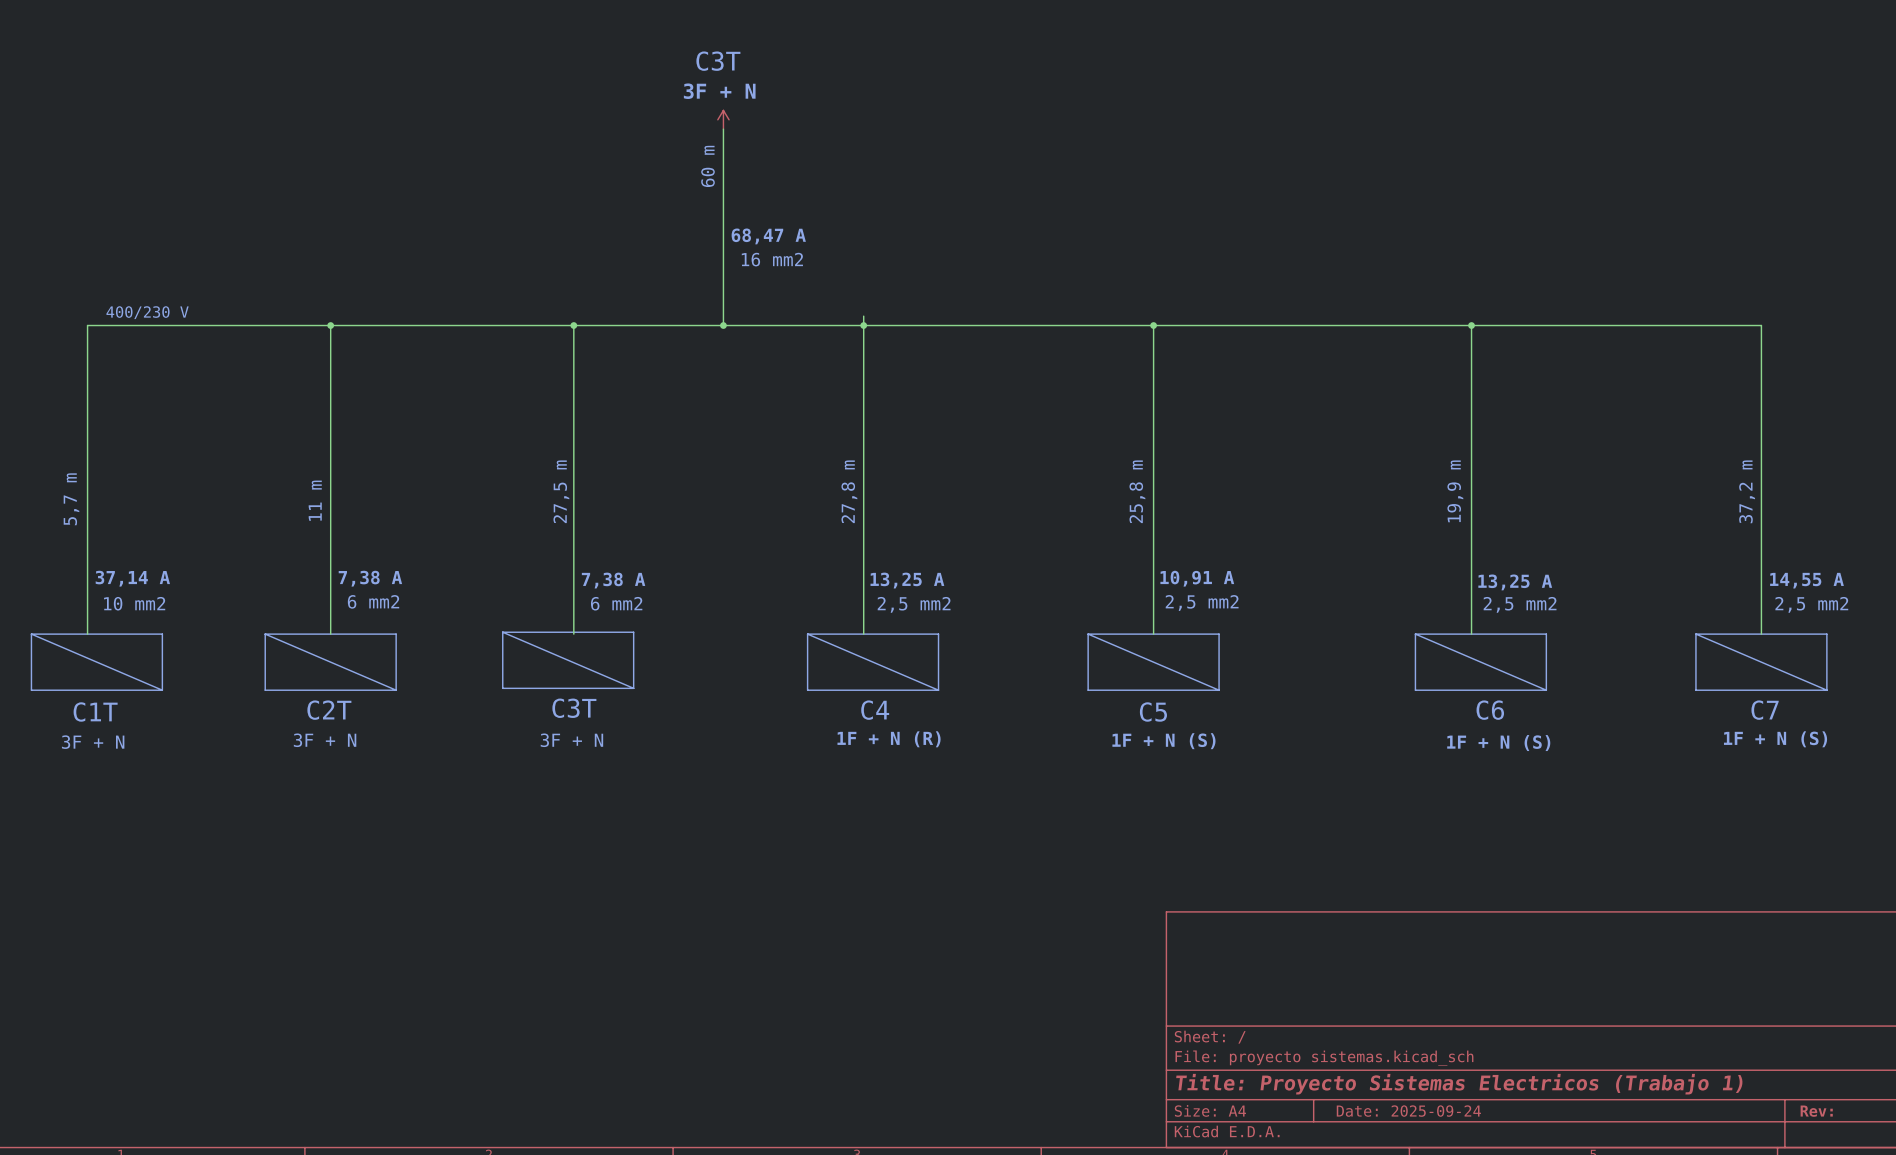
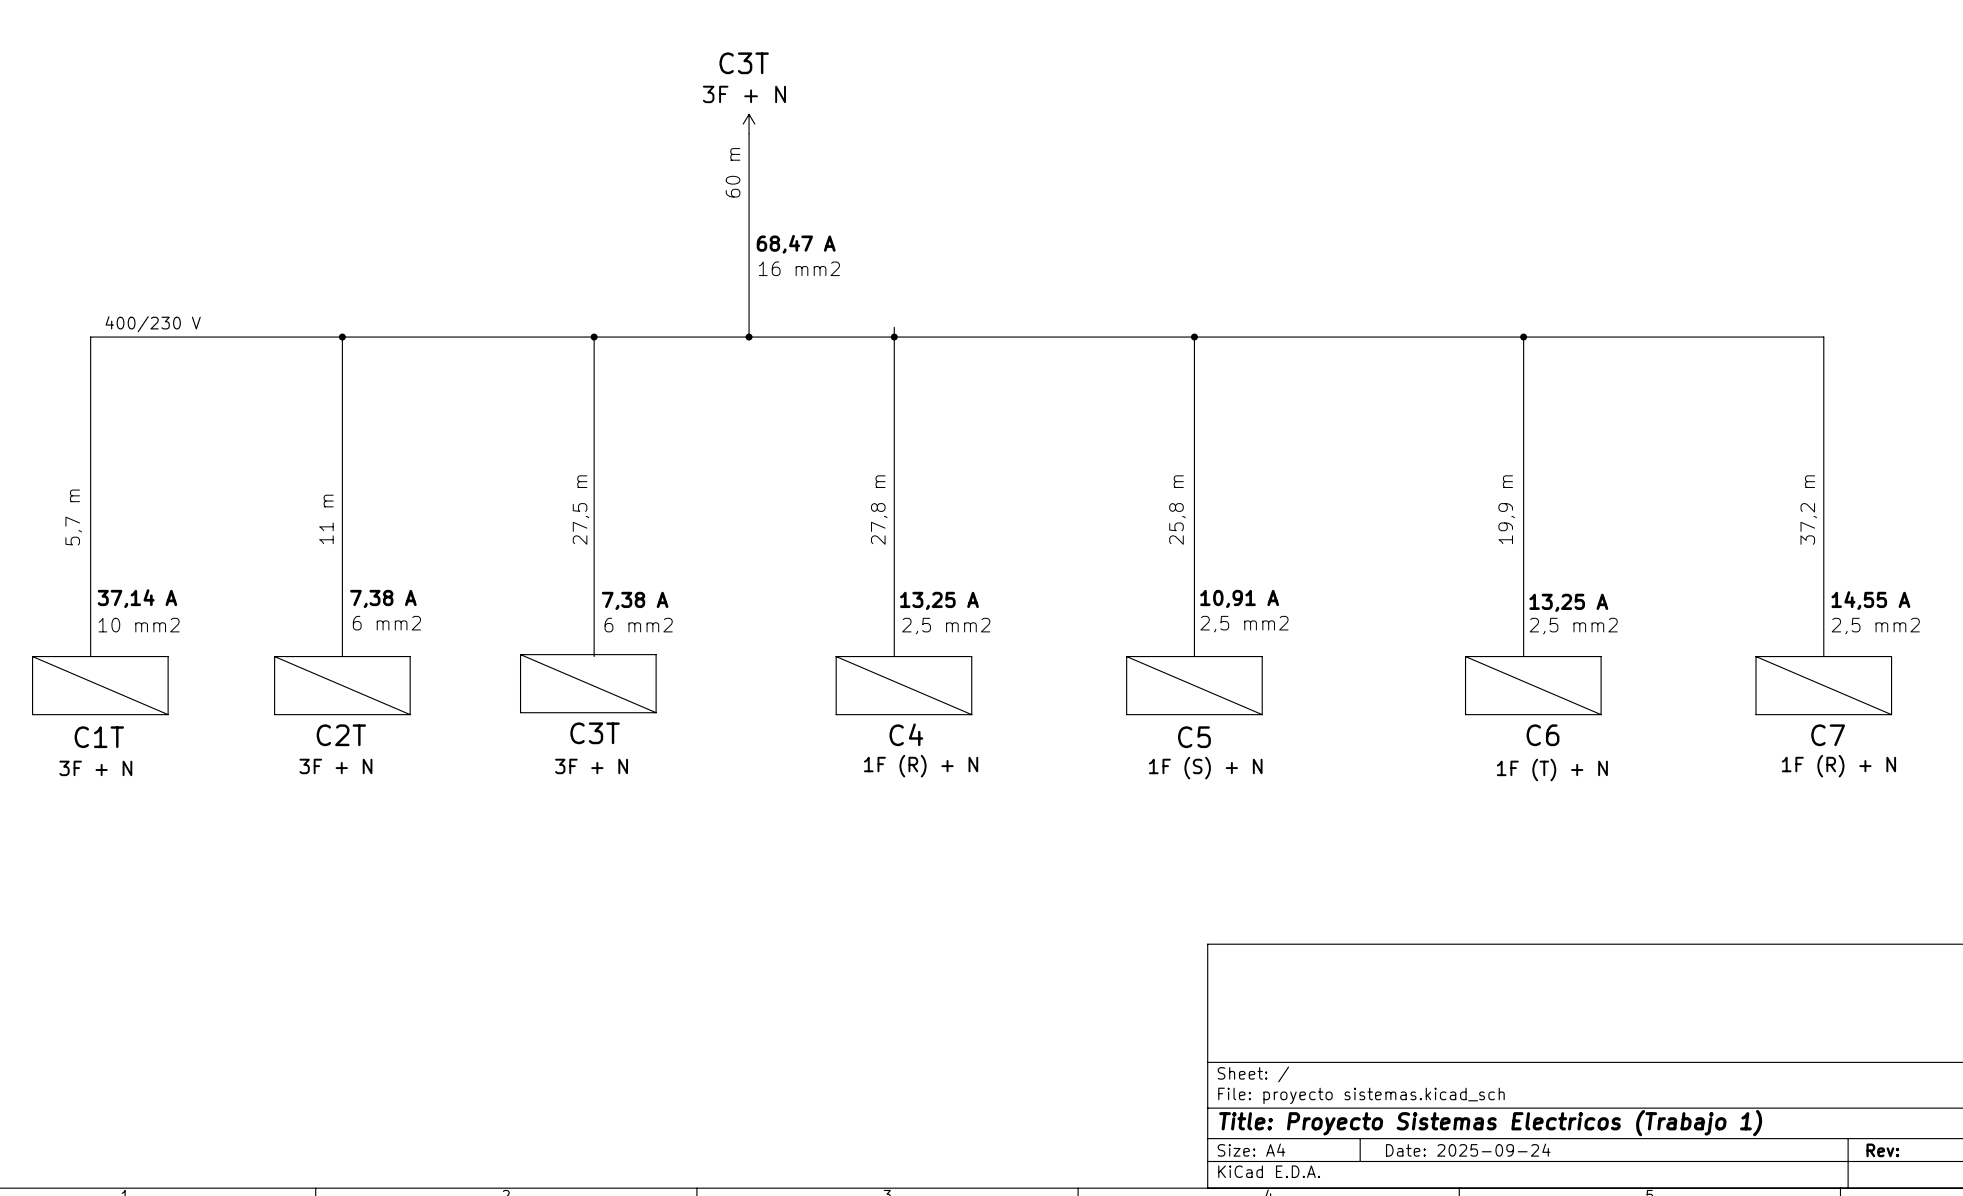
text: 1F + N (R) (889, 739) -> 1F (R) + N (921, 766)
text: 1F + N (S) (1775, 739) -> 1F (R) + N (1838, 766)
text: 1F + N (S) (1163, 741) -> 1F (S) + N (1205, 768)
text: 1F + N (S) (1498, 743) -> 1F (T) + N (1552, 770)

